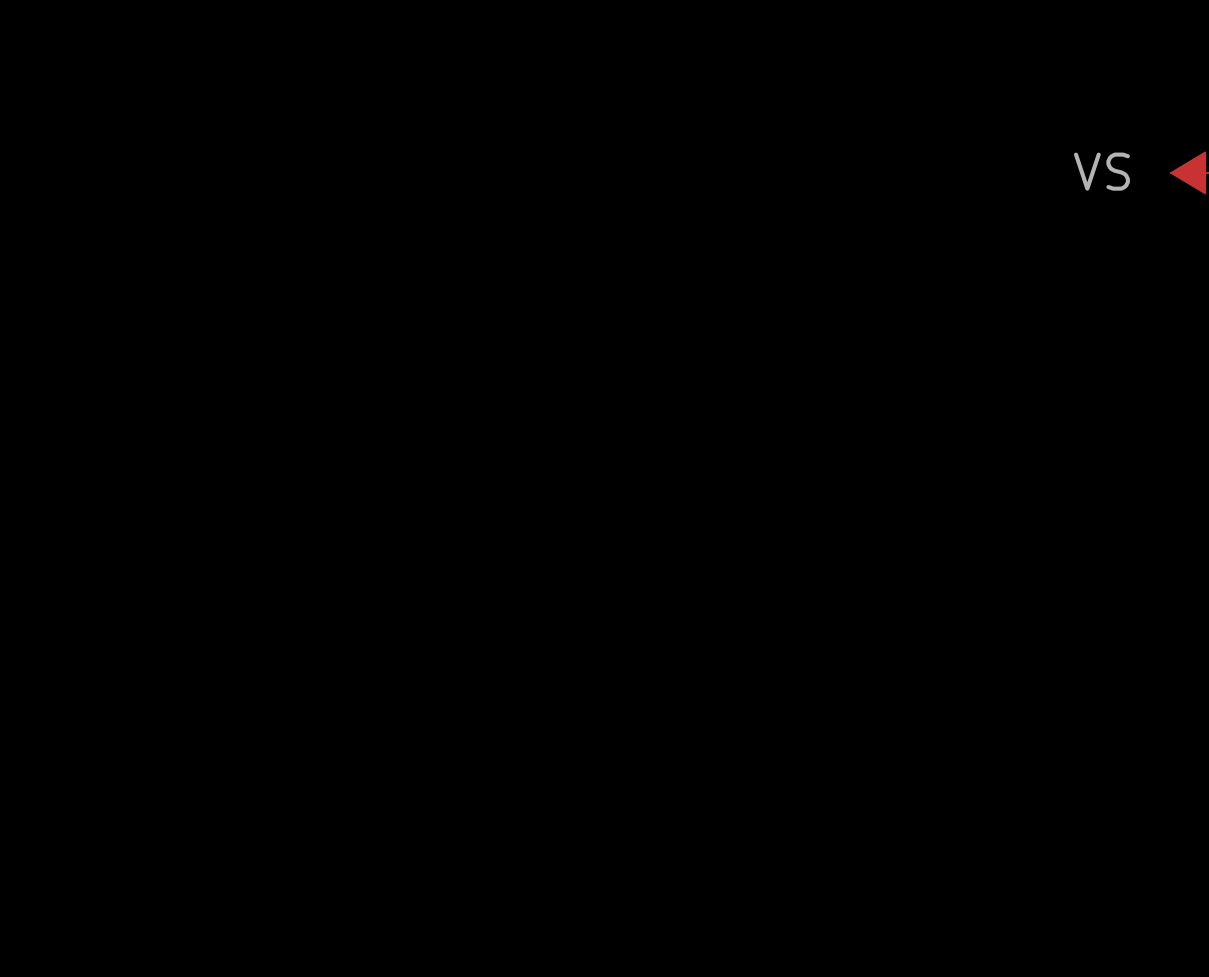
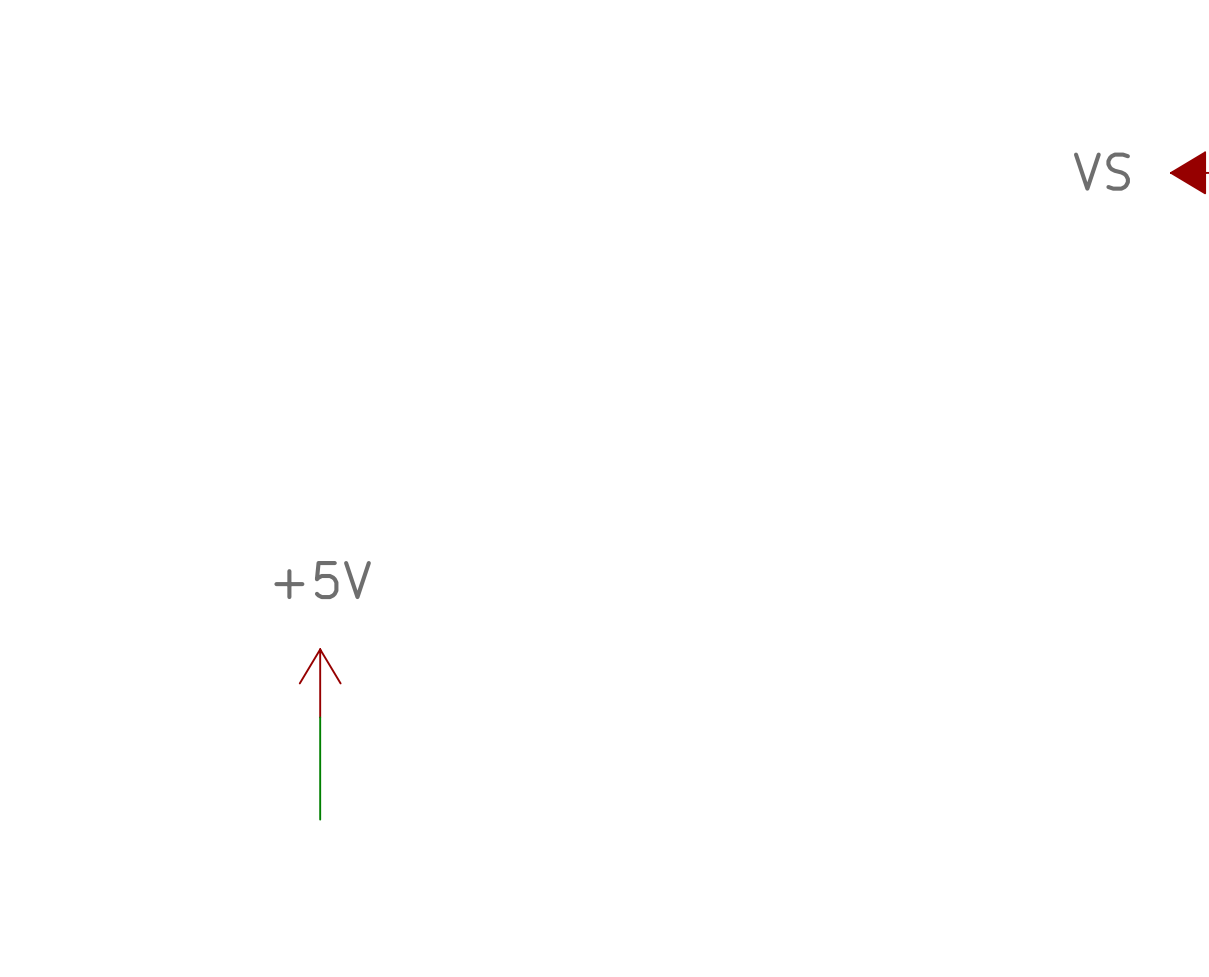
power symbol: none -> +5V (320, 683)
wire: none -> (320, 717) (320, 819)

